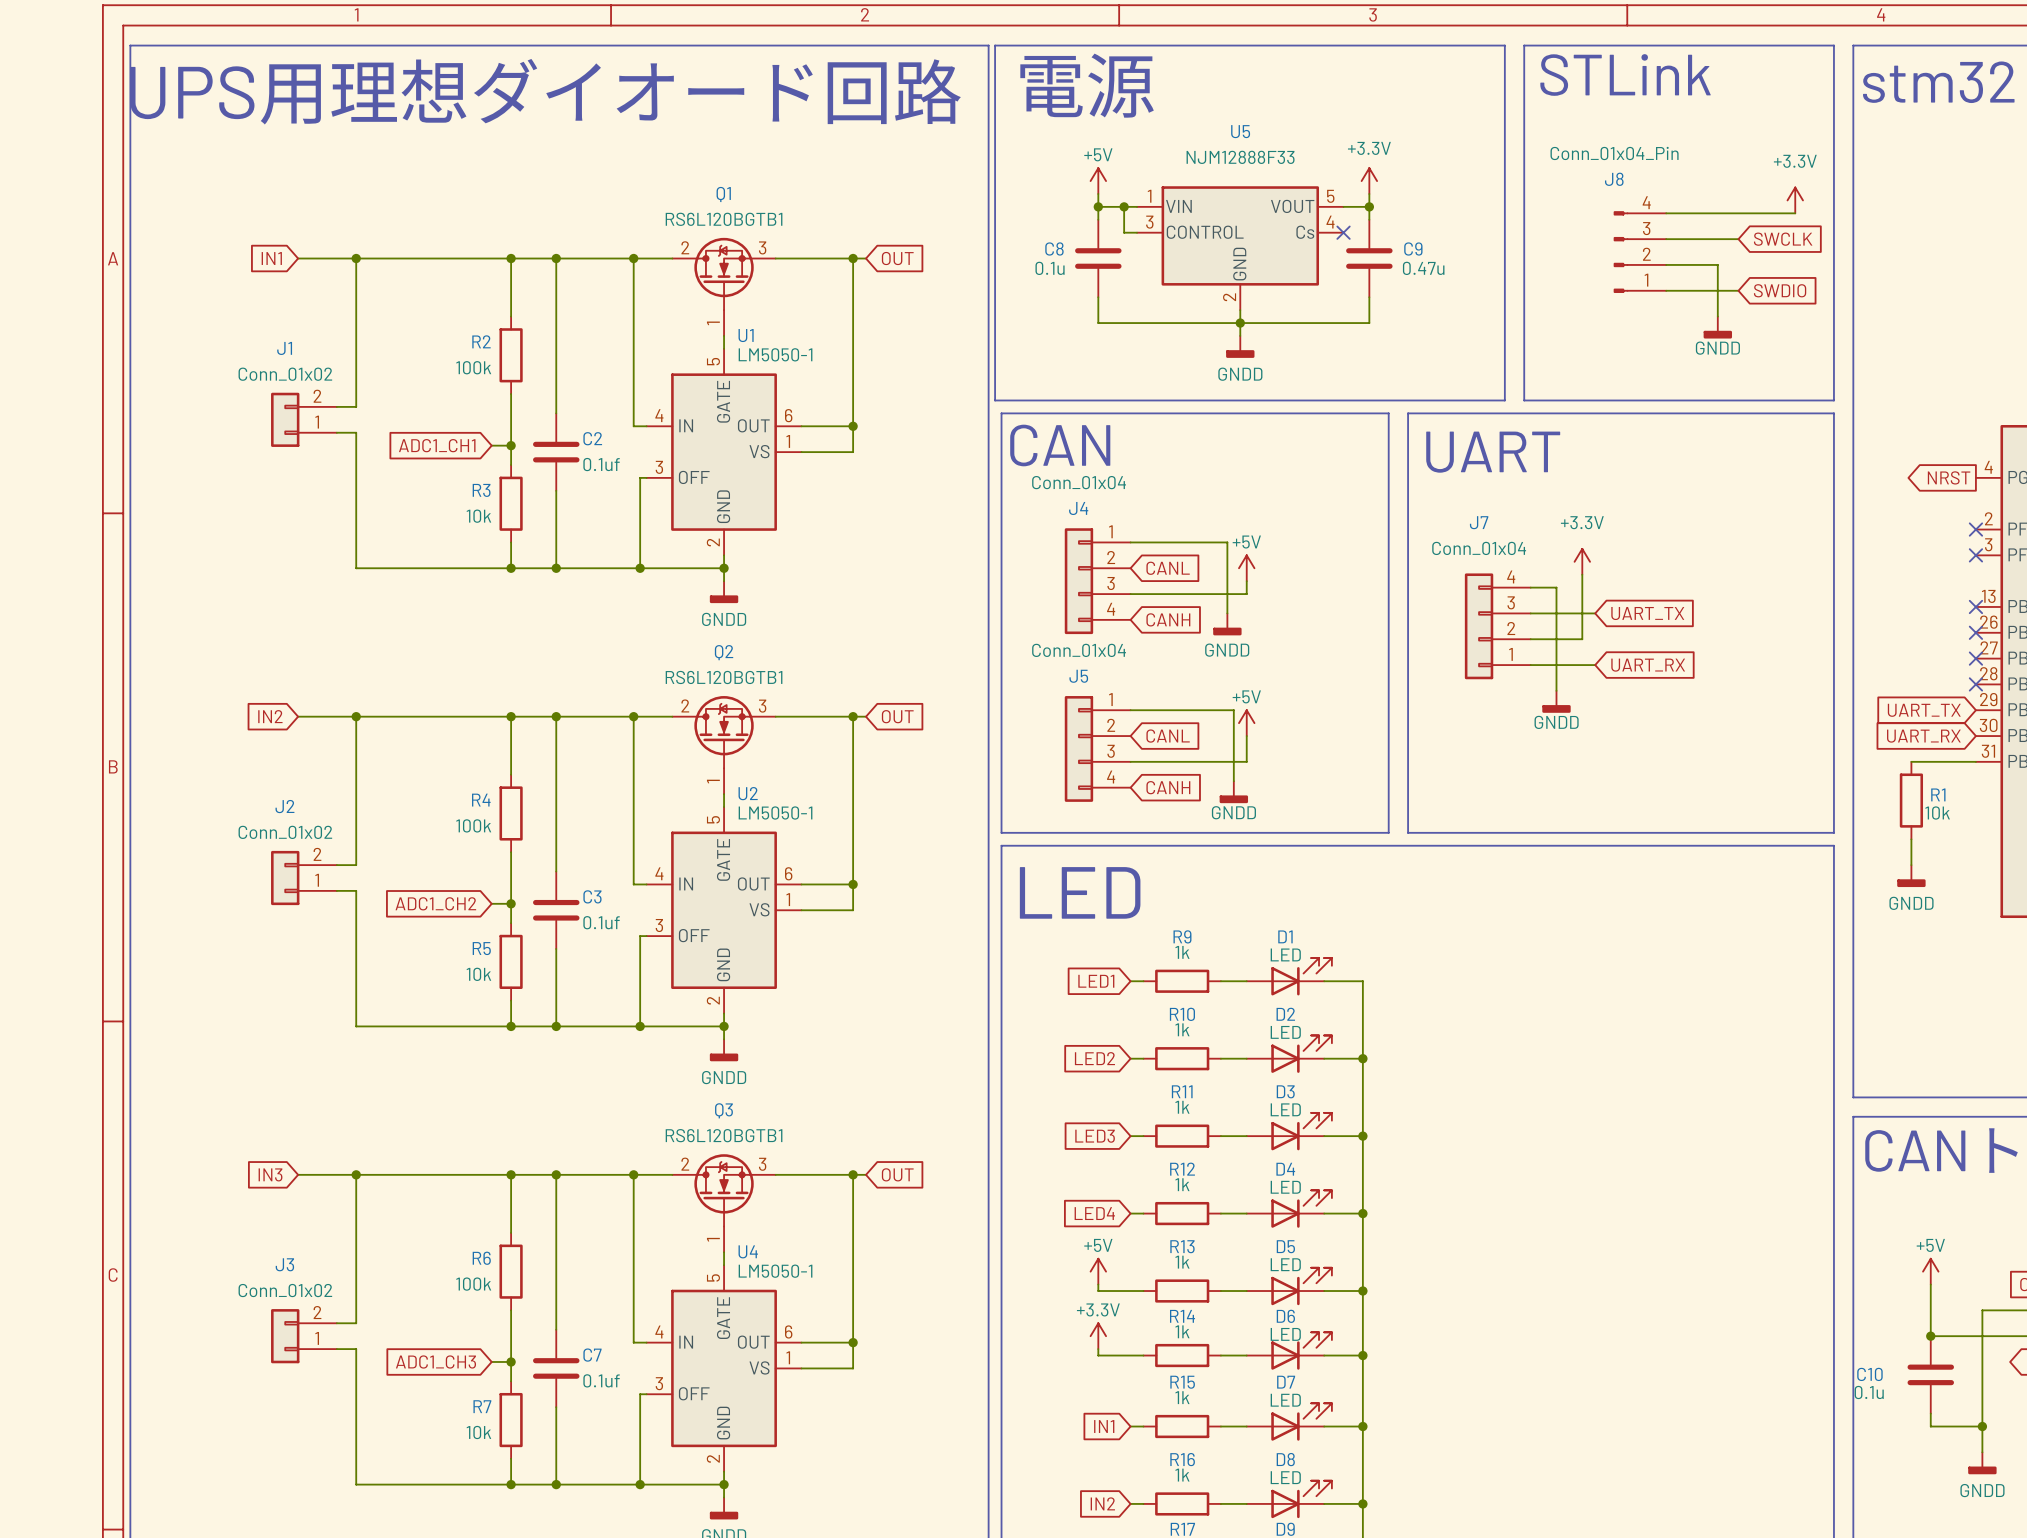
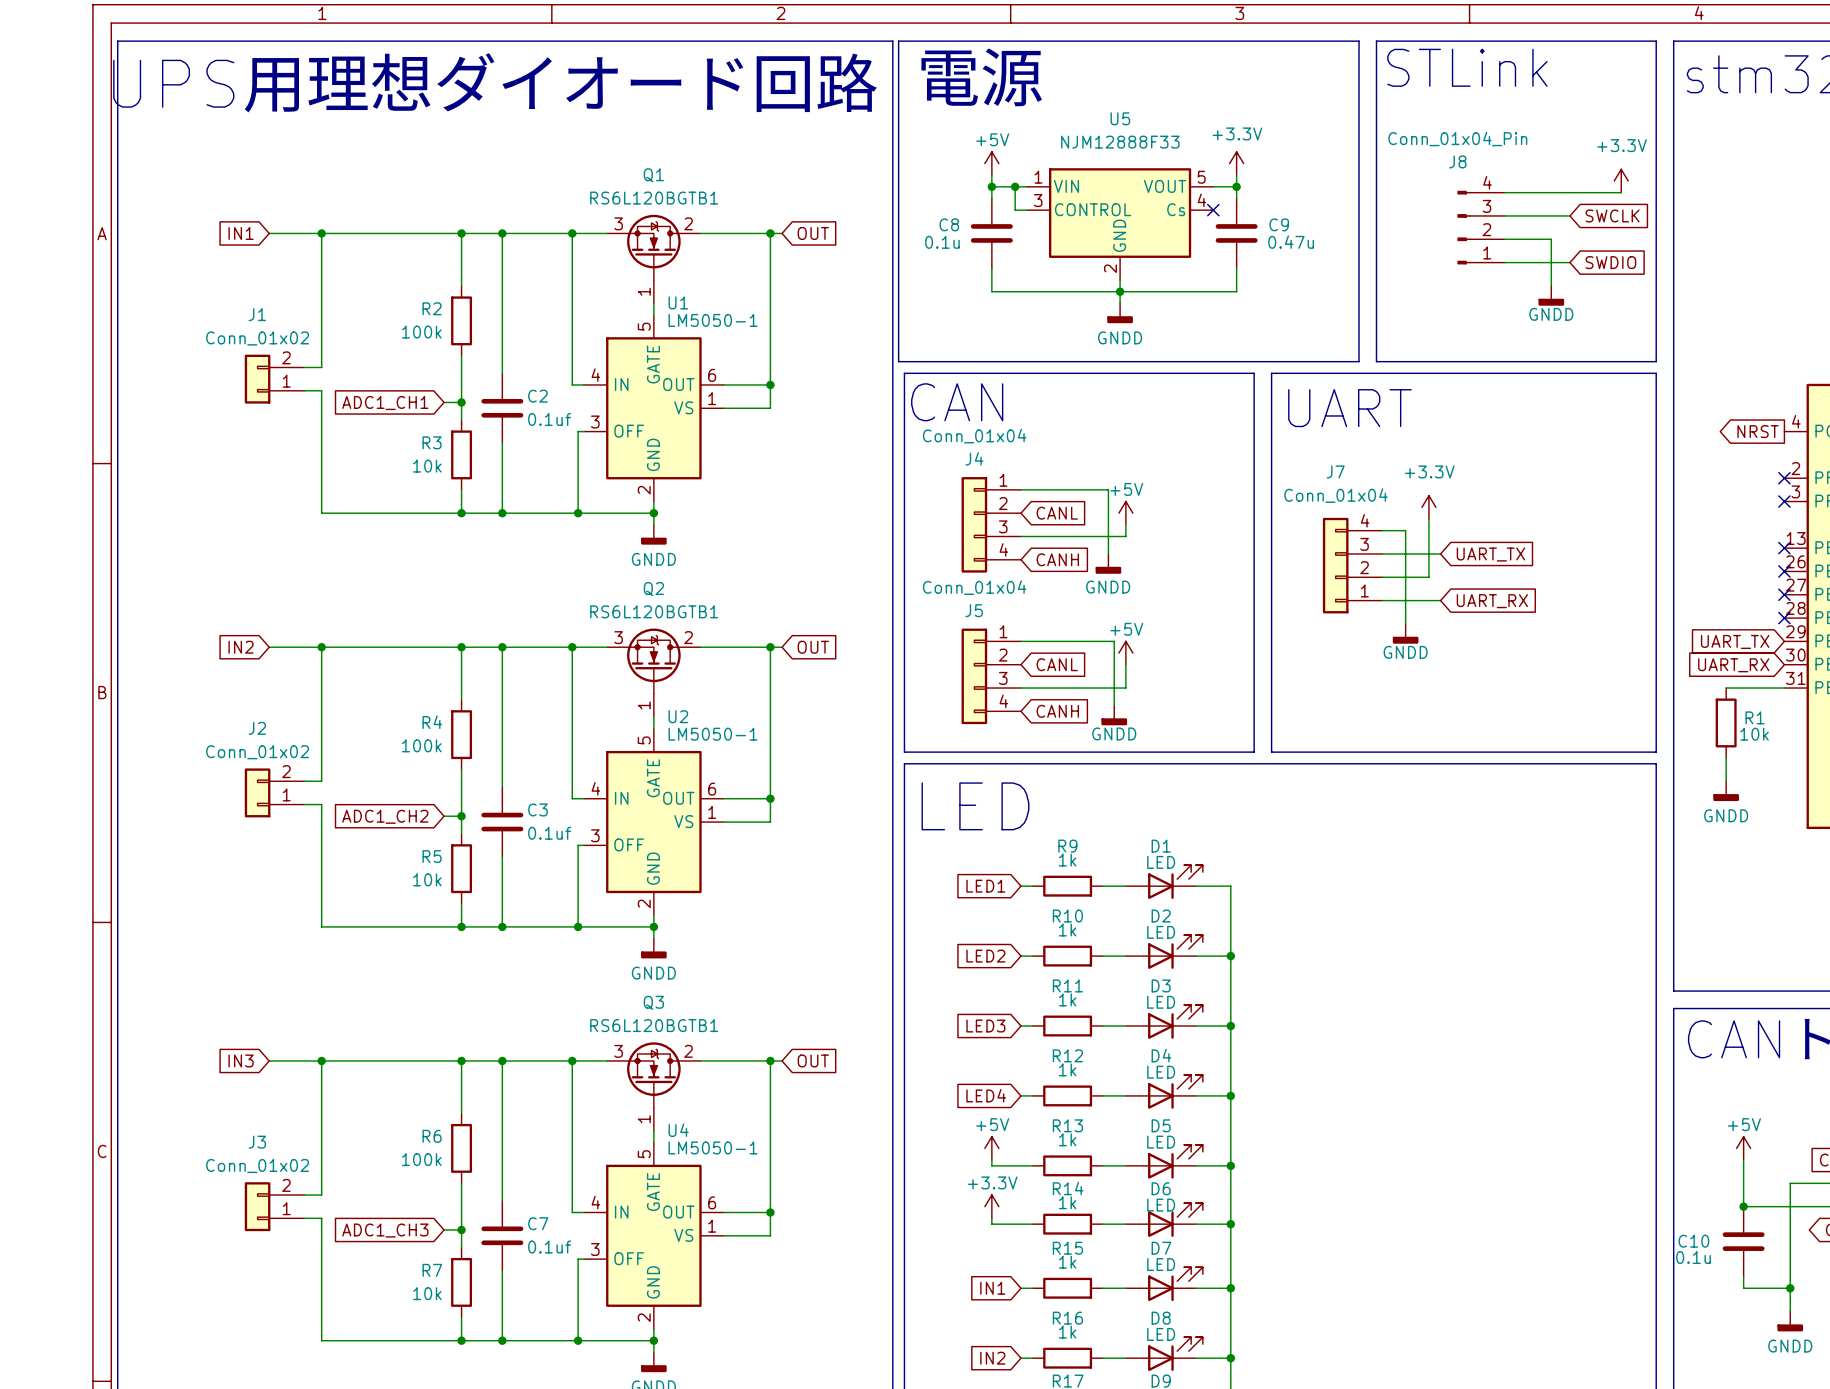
Q1 flip: as is (724, 274) -> left-right (653, 247)
Q2 flip: as is (724, 732) -> left-right (653, 661)
Q3 flip: as is (724, 1190) -> left-right (653, 1074)

